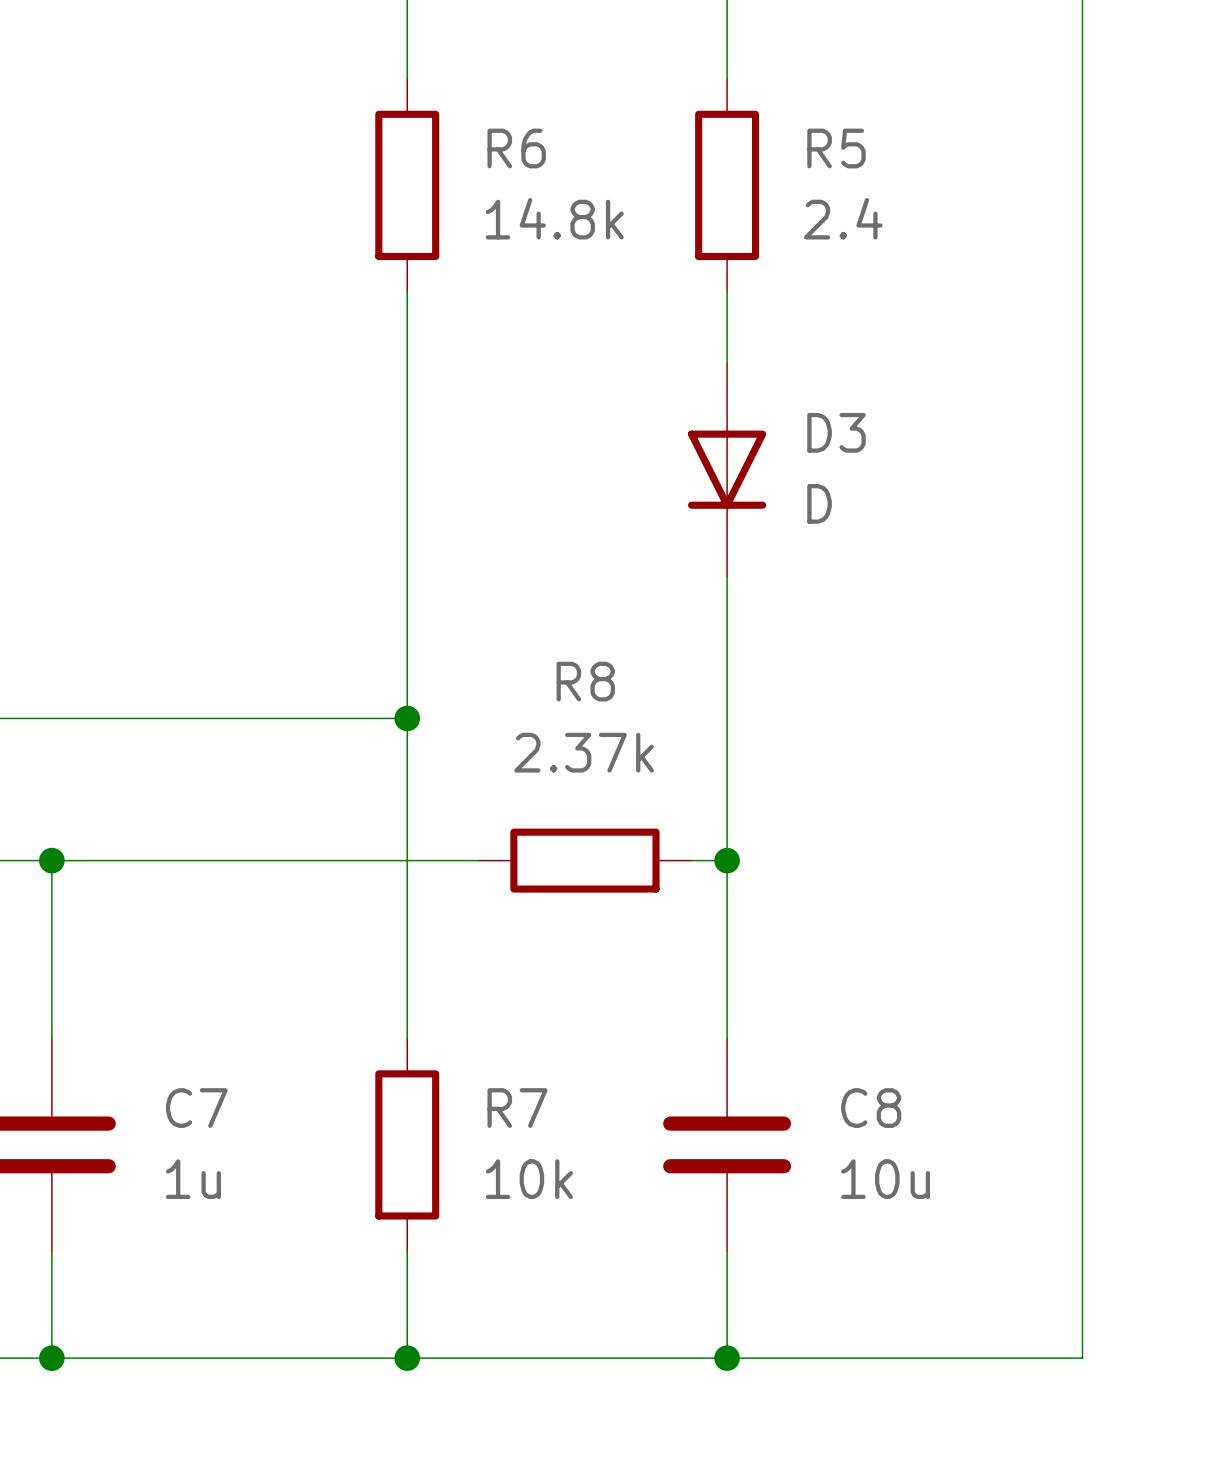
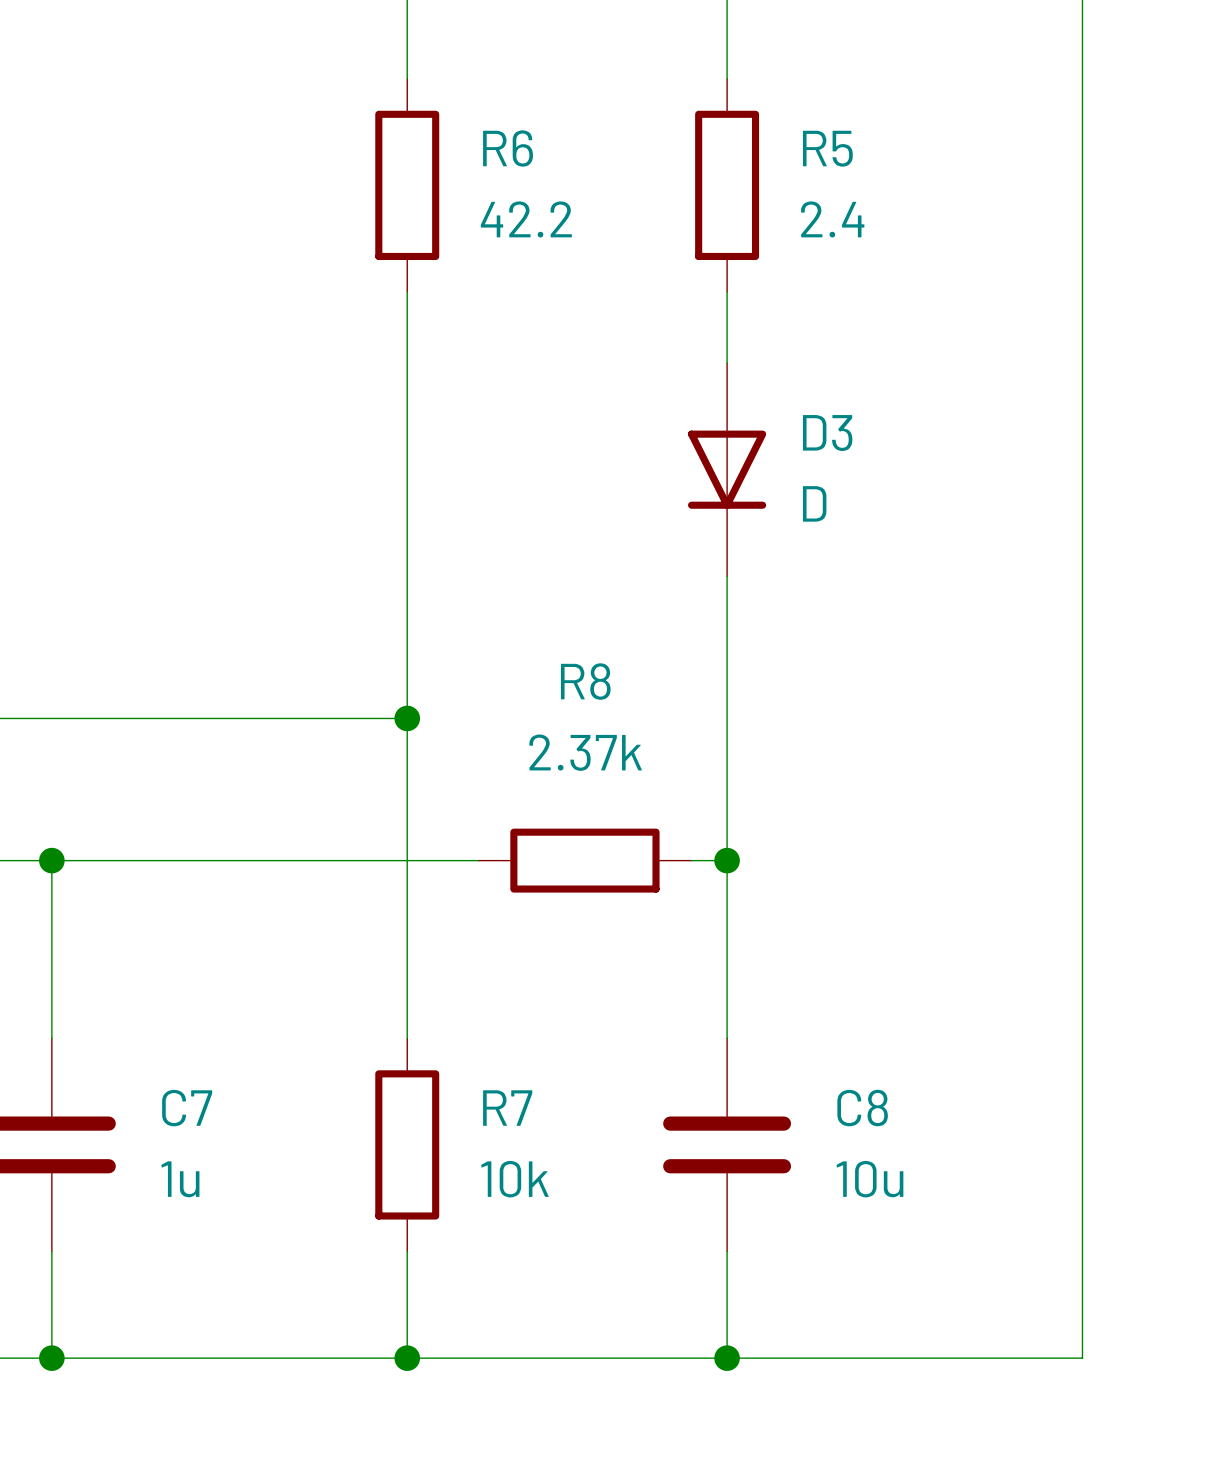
R6 value: 14.8k (554, 218) -> 42.2 (526, 219)

